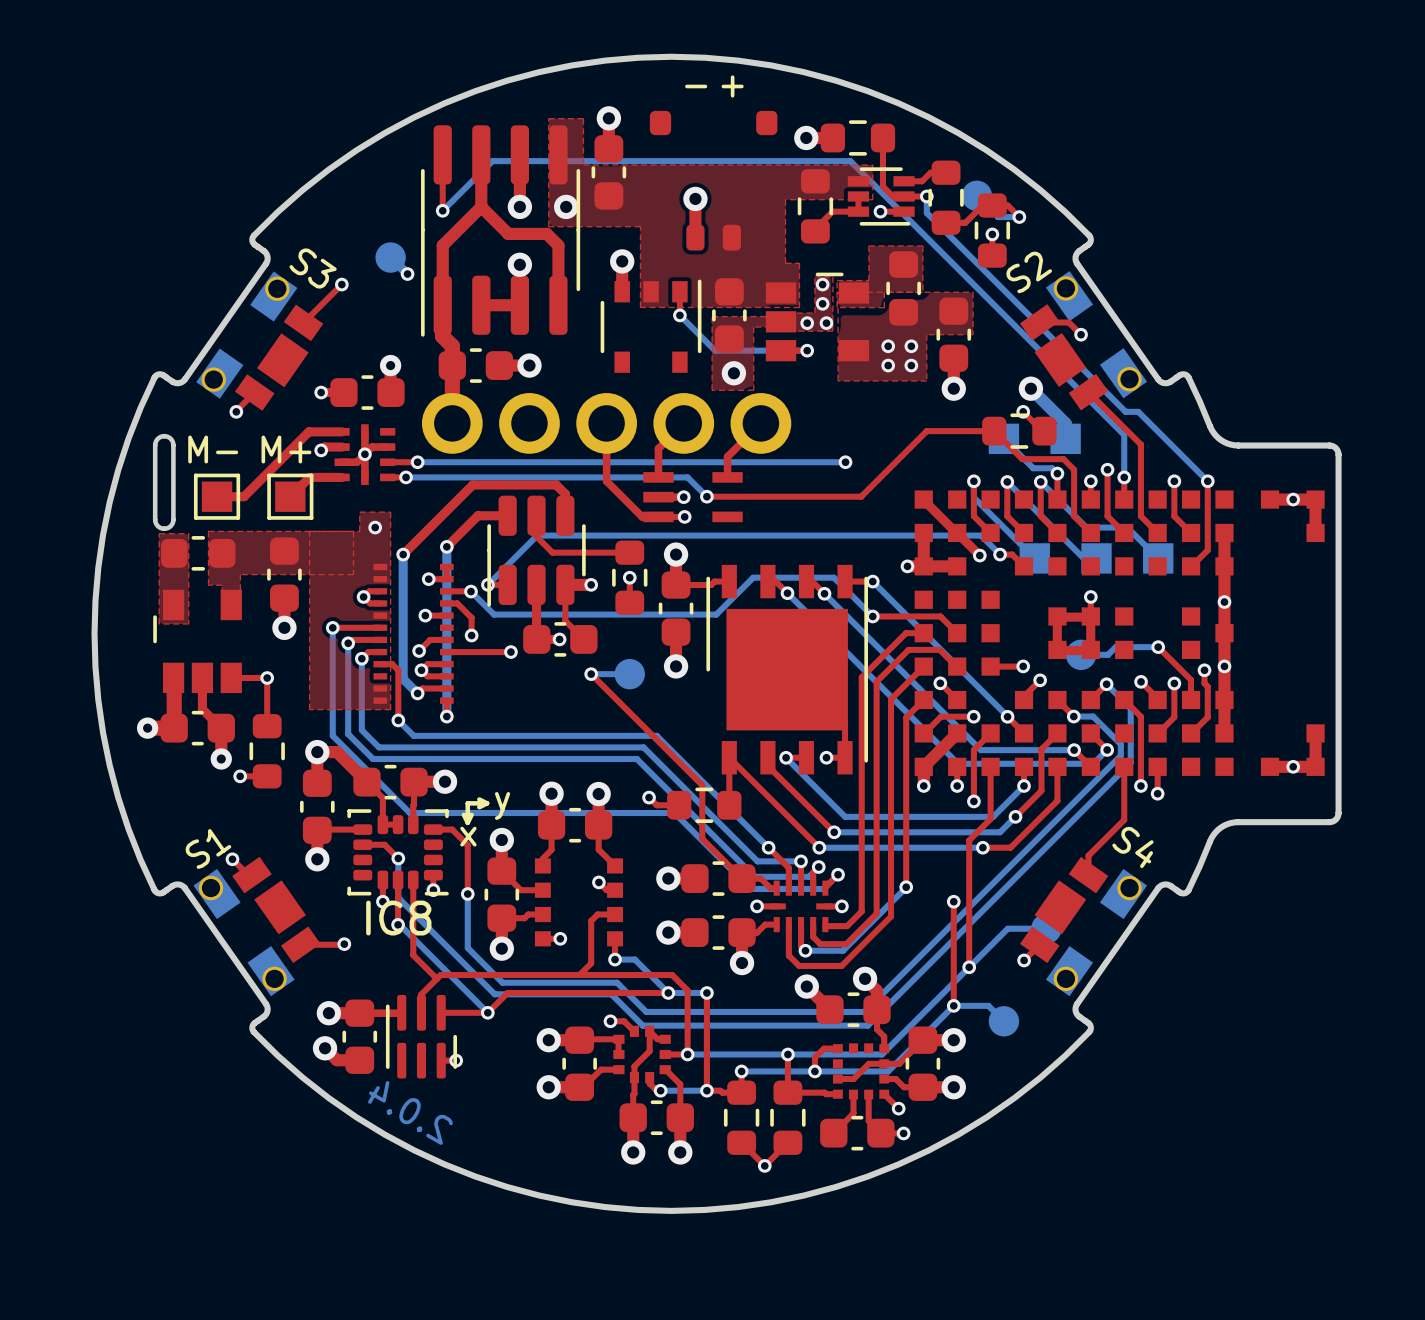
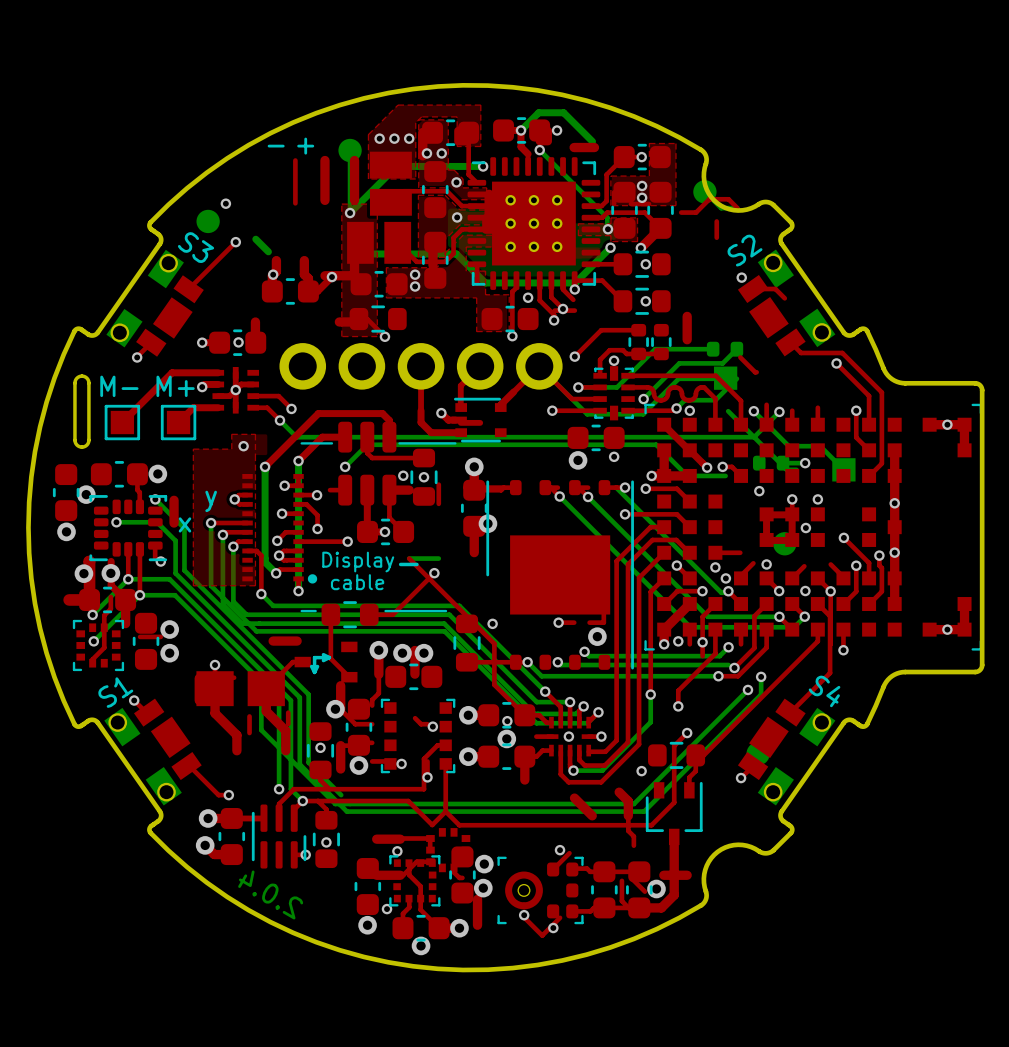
top zone outline: none -> (398, 105) (368, 134) (368, 179) (415, 179) (415, 122) (421, 116) (457, 116) (457, 146) (480, 146) (480, 105) (398, 105)
text position: - (696, 86) -> - (276, 146)
text position: + (732, 86) -> + (305, 146)
top zone outline: none -> (418, 119) (418, 187) (445, 187) (457, 199) (486, 199) (486, 187) (463, 187) (463, 179) (454, 170) (448, 170) (448, 119) (418, 119)
via size: [596, 106, 622, 131] -> [403, 133, 415, 144]
top track: none -> (503, 130) (521, 130) (521, 146) (528, 154) (528, 166)
bottom track: none -> (521, 130) (538, 112) (563, 112) (592, 141)
part: none -> (521, 130)
via: none -> (521, 130)
via: none -> (557, 130)
top zone outline: (548, 118) (548, 226) (640, 226) (640, 307) (799, 307) (799, 263) (785, 263) (785, 199) (872, 199) (872, 164) (583, 164) (583, 118) (548, 118) -> none
part: none -> (450, 132)
top track: none -> (468, 132) (468, 174) (476, 182)
via: none -> (379, 138)
via: none -> (394, 138)
top zone outline: none -> (649, 143) (649, 176) (610, 176) (610, 205) (675, 205) (675, 143) (649, 143)
via: (806, 137) -> none
part: (857, 137) -> none
top track: (882, 137) (882, 186) (892, 196) (926, 196) -> none
bottom track: none -> (350, 150) (350, 213) (396, 166) (483, 166)
part: none -> (350, 150)
bottom track: none -> (539, 150) (607, 217) (607, 229)
via: none -> (539, 150)
via: none -> (426, 153)
via: none -> (441, 153)
top track: none -> (641, 157) (624, 157) (606, 174) (606, 201) (601, 206) (590, 206)
via: none -> (641, 157)
part: none -> (642, 157)
via: none -> (483, 166)
part position: (608, 172) -> (435, 189)
top track: (946, 172) (930, 172) (922, 181) (904, 181) -> none
via: none -> (456, 182)
part: none -> (390, 183)
via: none -> (642, 185)
via size: [507, 194, 533, 220] -> [344, 207, 356, 219]
part: (881, 196) -> none
bottom track: (926, 196) (926, 212) (1125, 411) (1138, 411) (1207, 481) -> none
via: (926, 196) -> none
part: (946, 197) -> none
via: (695, 198) -> none
top zone outline: none -> (418, 195) (418, 257) (445, 257) (445, 239) (459, 224) (489, 224) (489, 210) (459, 209) (445, 195) (418, 195)
via: none -> (642, 197)
via: (566, 206) -> none
part: (815, 206) -> none
top track: none -> (393, 201) (403, 191) (447, 191) (461, 206) (476, 206)
bottom track: (442, 210) (492, 161) (850, 161) (1124, 435) (1124, 477) -> none
via: (442, 210) -> none
via: none -> (225, 203)
top zone outline: none -> (341, 204) (377, 204) (377, 336) (341, 336) (341, 204)
top track: (855, 211) (832, 211) (815, 228) (815, 231) -> none
via: (880, 211) -> none
via: (1019, 217) -> none
part: none -> (624, 210)
part: none -> (660, 210)
via: none -> (457, 217)
top track: none -> (590, 217) (602, 217) (607, 212) (644, 212) (660, 228) (640, 248)
top zone outline: none -> (610, 217) (610, 223) (578, 223) (578, 235) (610, 235) (610, 241) (637, 241) (637, 217) (610, 217)
part: (500, 230) -> none
part: (992, 230) -> none
via: (992, 234) -> none
board edge: (253, 235) (302, 190) (356, 150) (414, 117) (444, 103) (507, 80) (572, 65) (605, 60) (671, 56) (738, 60) (771, 65) (836, 80) (898, 103) (958, 133) (986, 150) (1040, 190) (1089, 235) -> (150, 222) (187, 188) (227, 158) (293, 122) (363, 98) (413, 89) (462, 85) (537, 90) (586, 100) (633, 116) (679, 137) (703, 151) (706, 158) (703, 172) (705, 185) (711, 197) (717, 203) (725, 207) (738, 210) (751, 208) (762, 202) (769, 202) (790, 222)
part: none -> (533, 223)
top track: none -> (476, 229) (462, 229) (453, 237) (453, 253) (445, 261) (416, 261) (397, 242)
via: none -> (607, 229)
part footprint: [886, 251, 921, 326] -> [613, 250, 671, 278]
top zone outline: none -> (463, 235) (501, 235) (501, 247) (466, 247) (466, 271) (485, 271) (485, 294) (509, 294) (509, 331) (476, 331) (476, 297) (386, 297) (386, 267) (436, 267) (445, 258) (445, 252) (463, 235)
part position: (390, 257) -> (208, 221)
top track: none -> (235, 242) (218, 259)
via: none -> (235, 242)
via: (622, 261) -> none
part: none -> (379, 242)
via: (519, 264) -> none
bottom track: none -> (610, 247) (575, 282) (485, 282) (456, 253) (362, 253)
via: none -> (610, 247)
via: none -> (640, 248)
via: (407, 274) -> none
top zone outline: (814, 276) (814, 313) (768, 313) (768, 331) (832, 331) (832, 276) (814, 276) -> none
via: (341, 284) -> none
via: (822, 284) -> none
top track: none -> (276, 260) (276, 271) (272, 275) (272, 291)
top track: none -> (304, 260) (304, 274) (308, 278) (308, 291) (317, 291) (331, 277)
part: none -> (435, 260)
top track: none -> (590, 264) (622, 264)
via: none -> (645, 264)
top zone outline: (838, 292) (973, 292) (973, 334) (926, 334) (926, 380) (838, 380) (838, 292) -> none
top zone outline: (884, 292) (884, 307) (837, 307) (837, 280) (868, 280) (868, 245) (922, 245) (922, 292) -> none
via: none -> (273, 274)
via: none -> (415, 274)
via: (822, 303) -> none
top track: (558, 305) (558, 245) (546, 233) (508, 233) (481, 206) (442, 245) (442, 336) (452, 346) (452, 423) -> none
via: none -> (331, 277)
via: none -> (741, 277)
top track: none -> (516, 280) (516, 287) (512, 291) (512, 335)
top track: none -> (539, 280) (539, 300) (554, 314) (554, 320)
top track: none -> (551, 280) (551, 297) (562, 308)
top track: none -> (563, 280) (563, 289) (573, 299)
top track: none -> (574, 280) (602, 280) (622, 301)
bottom track: (679, 315) (715, 350) (807, 350) -> none
via: (679, 315) -> none
part rotation: 0° (729, 315) -> 90° clockwise (510, 319)
part position: (729, 315) -> (510, 319)
part: none -> (379, 284)
top zone outline: (712, 316) (712, 390) (753, 390) (753, 327) (790, 327) (790, 316) (712, 316) -> none
part: (817, 316) -> none
via: none -> (415, 286)
via: (826, 323) -> none
part: none -> (290, 291)
part: (651, 326) -> none
via: none -> (528, 297)
part: (953, 334) -> none
via: (1081, 334) -> none
part: none -> (642, 301)
via: none -> (645, 301)
via: (888, 346) -> none
via: (911, 346) -> none
via: none -> (562, 308)
via: (807, 350) -> none
top track: none -> (358, 319) (367, 319) (384, 336)
part: none -> (378, 319)
via size: [721, 361, 747, 386] -> [507, 330, 518, 342]
via: none -> (554, 320)
via: (390, 365) -> none
part: (475, 365) -> none
via: (529, 365) -> none
via: (888, 365) -> none
via: (911, 365) -> none
top track: none -> (638, 330) (601, 330) (574, 356)
via: none -> (384, 336)
via: (953, 388) -> none
bottom track: (1030, 388) (1065, 423) (1065, 438) -> none
via: (1030, 388) -> none
part: none -> (638, 342)
part: none -> (661, 342)
via: none -> (238, 342)
bottom track: none -> (713, 349) (655, 349) (616, 387) (578, 387)
part: none -> (725, 349)
bottom track: none -> (736, 349) (722, 363) (679, 363) (643, 399)
top track: (1102, 405) (1140, 444) (1140, 516) (1157, 532) -> (801, 352) (842, 352) (881, 392) (881, 410)
top track: none -> (661, 353) (626, 353) (622, 350) (609, 350) (600, 359) (600, 375)
via: none -> (574, 356)
via: (1023, 411) -> none
via: none -> (614, 360)
top track: none -> (836, 363) (869, 395) (869, 424)
via: none -> (836, 363)
top track: none -> (539, 366) (572, 399) (600, 399)
bottom track: none -> (539, 366) (587, 414) (643, 414) (678, 378) (713, 378)
top track: (308, 431) (244, 496) (217, 496) -> (192, 372) (172, 372) (122, 422)
part: (1019, 431) -> none
top track: none -> (628, 375) (715, 375) (741, 400) (741, 424)
bottom track: (1003, 438) (1033, 468) (1052, 468) (1057, 473) -> none
part: (1065, 438) -> none
bottom track: none -> (736, 378) (715, 400) (684, 400) (676, 408)
top track: none -> (578, 387) (600, 387)
via: none -> (578, 387)
top track: none -> (628, 387) (650, 387) (655, 397) (660, 400) (666, 398) (668, 390) (672, 387) (679, 388) (683, 398) (689, 400) (694, 397) (698, 388) (704, 387) (715, 398) (715, 424)
top track: (727, 456) (727, 477) -> (513, 391) (500, 404) (500, 407)
part: none -> (614, 393)
top track: none -> (276, 396) (278, 396) (291, 408)
bottom track: (417, 462) (845, 462) -> none
via: (417, 462) -> none
via: (845, 462) -> none
via: none -> (643, 399)
top track: (1107, 469) (1107, 516) (1124, 532) -> none
via: (1107, 469) -> none
part footprint: [643, 472, 743, 523] -> [451, 397, 507, 443]
via: (1057, 473) -> none
top track: none -> (267, 407) (279, 420)
bottom track: (406, 477) (687, 477) (706, 496) -> none
via: (406, 477) -> none
via: (1124, 477) -> none
via: none -> (291, 408)
top track: none -> (676, 408) (674, 410) (628, 410)
via: none -> (676, 408)
top track: (606, 481) (642, 516) (684, 516) -> (421, 410) (421, 422) (431, 432) (461, 432)
top track: none -> (552, 410) (600, 410)
via: none -> (552, 410)
top track: (973, 481) (973, 516) (990, 532) -> none
bottom track: (973, 481) (973, 497) (1034, 558) -> none
via position: (973, 481) -> (689, 410)
top track: (1007, 481) (1007, 516) (1024, 532) -> none
via: (1007, 481) -> none
top track: (1040, 481) (1040, 516) (1057, 532) -> none
via: (1090, 481) -> none
via: (1207, 481) -> none
bottom track: none -> (779, 411) (754, 437) (296, 437) (279, 420)
via: none -> (779, 411)
top track: none -> (441, 413) (448, 420) (455, 420)
via: none -> (441, 413)
part footprint: [914, 490, 1325, 776] -> [644, 403, 983, 651]
via: none -> (279, 420)
part footprint: [487, 495, 586, 607] -> [338, 421, 397, 506]
top track: (706, 496) (861, 496) (926, 431) (994, 431) (1022, 459) (1063, 459) (1074, 469) (1074, 516) (1090, 532) -> none
via: (706, 496) -> none
via: (683, 497) -> none
via: (684, 516) -> none
part: none -> (596, 437)
line: none -> (301, 443) (331, 443)
line: none -> (399, 443) (455, 443)
top zone outline: (309, 531) (208, 531) (208, 585) (222, 585) (222, 612) (240, 612) (240, 574) (353, 574) (353, 531) -> none
top zone outline: (159, 533) (159, 623) (188, 623) (188, 533) (159, 533) -> none
part footprint: [161, 536, 236, 571] -> [90, 461, 148, 488]
via: none -> (614, 456)
top track: (542, 543) (552, 552) (629, 552) -> (372, 458) (424, 458)
via: none -> (578, 460)
part: none -> (771, 463)
bottom track: none -> (783, 463) (805, 463)
via: none -> (805, 463)
bottom track: none -> (345, 466) (367, 444) (656, 444) (687, 475) (725, 475)
bottom track: (1000, 554) (981, 535) (537, 535) (487, 584) -> none
part: (1034, 558) -> none
part: (1096, 558) -> none
via: none -> (157, 473)
part footprint: [373, 563, 454, 704] -> [242, 473, 318, 584]
top track: none -> (137, 474) (139, 506)
part footprint: [706, 564, 868, 775] -> [486, 480, 634, 670]
via: none -> (403, 475)
via: none -> (424, 477)
part: (284, 574) -> none
part position: (629, 577) -> (424, 477)
via: (629, 577) -> none
bottom track: none -> (616, 487) (721, 592) (729, 592)
bottom track: (872, 581) (1007, 716) -> none
top track: none -> (645, 488) (677, 488) (689, 501)
via: none -> (645, 488)
via position: (487, 584) -> (345, 466)
via: (591, 584) -> none
via: none -> (759, 491)
part: none -> (66, 492)
part footprint: [153, 589, 242, 694] -> [89, 495, 168, 562]
via: none -> (86, 494)
bottom track: (471, 591) (494, 614) (716, 614) (753, 577) (833, 577) (872, 616) -> none
via: none -> (155, 499)
via: none -> (817, 499)
bottom track: none -> (116, 522) (157, 522) (175, 540) (175, 573) (299, 697) (299, 764) (346, 811) (644, 811) (761, 694) (761, 676)
via: none -> (116, 522)
via: (284, 627) -> none
via: none -> (805, 528)
via: none -> (66, 531)
bottom track: (1158, 647) (1115, 647) (1108, 654) (1081, 654) -> none
top track: none -> (155, 545) (155, 558)
top track: none -> (128, 549) (128, 579)
top track: none -> (139, 549) (139, 595)
via position: (676, 666) -> (487, 523)
via: (1023, 666) -> none
via position: (591, 674) -> (434, 573)
part: (629, 674) -> none
top track: (231, 677) (267, 677) (267, 726) -> none
text: none -> Display (358, 562)
via position: (1040, 680) -> (766, 564)
line: none -> (400, 564) (416, 564)
via: (1141, 681) -> none
bottom track: (1106, 684) (1130, 708) (1130, 762) (867, 1025) (642, 1025) (611, 994) -> (747, 689) (633, 804) (424, 804)
via: (1106, 684) -> none
via: none -> (715, 567)
via: none -> (83, 573)
via: none -> (110, 573)
top track: none -> (434, 573) (392, 614) (369, 614)
via: none -> (725, 578)
via: none -> (128, 579)
text: none -> cable (357, 582)
bottom track: (332, 709) (332, 735) (409, 813) (674, 813) (750, 888) (757, 888) -> (211, 585) (256, 631) (444, 631) (536, 723)
bottom track: (1073, 716) (1093, 716) (1120, 744) (1120, 755) (864, 1011) (646, 1011) (617, 982) (502, 982) -> none
via: none -> (805, 591)
via: none -> (830, 591)
via: none -> (139, 595)
top track: none -> (110, 597) (110, 608) (104, 615) (104, 647) (92, 659) (92, 663)
via: (147, 728) -> none
line: none -> (301, 611) (315, 611)
line: none -> (385, 611) (446, 611)
bottom track: none -> (92, 614) (128, 579) (169, 579) (290, 700) (290, 789) (302, 801)
via: none -> (92, 614)
top track: none -> (330, 614) (330, 658) (349, 677)
part: none -> (350, 614)
via size: [819, 750, 834, 765] -> [588, 627, 607, 646]
part: (267, 751) -> none
via: (317, 752) -> none
top track: (767, 757) (767, 765) (834, 832) -> none
bottom track: (786, 757) (845, 816) (993, 816) (1024, 786) -> none
via: (221, 759) -> none
via: none -> (492, 623)
via: none -> (169, 629)
via: (240, 776) -> none
via: (445, 781) -> none
bottom track: none -> (93, 641) (139, 595) (174, 595) (279, 699) (279, 789)
via: none -> (93, 641)
part: none -> (146, 641)
part: (390, 782) -> none
top track: (414, 782) (413, 824) -> none
via: none -> (678, 641)
top track: (1124, 782) (1124, 819) (1088, 855) (1088, 875) -> (817, 604) (830, 616) (830, 673) (790, 712)
top track: none -> (817, 641) (703, 755) (695, 755) (695, 771) (689, 777) (689, 790)
top track: (317, 783) (317, 752) (336, 752) (382, 798) (382, 824) (398, 824) -> none
via: none -> (702, 642)
via: (957, 786) -> none
via position: (1024, 786) -> (728, 647)
via: (1140, 786) -> none
part: none -> (98, 645)
bottom track: none -> (728, 647) (719, 656) (588, 656) (584, 651)
top track: (1057, 790) (1057, 800) (1010, 847) (982, 847) -> (766, 647) (738, 676) (718, 676)
via: (598, 794) -> none
via: none -> (584, 651)
via: none -> (169, 653)
via: none -> (402, 653)
via: none -> (424, 653)
top track: (649, 797) (656, 805) (678, 805) -> none
via: (649, 797) -> none
top track: (990, 798) (990, 819) (969, 840) (969, 967) -> (715, 653) (678, 690) (678, 706)
via: (973, 801) -> none
text position: y (502, 805) -> y (211, 501)
part rotation: 0° (704, 805) -> 90° clockwise (467, 643)
top track: (729, 805) (729, 757) (819, 847) -> none
part: (317, 806) -> none
top track: none -> (302, 662) (292, 662) (266, 688) (266, 711) (285, 730) (285, 750)
part: none -> (326, 662)
top track: none -> (467, 662) (527, 662)
bottom track: none -> (527, 662) (541, 676) (718, 676)
via: none -> (527, 662)
bottom track: none -> (557, 662) (560, 665) (728, 665)
via: none -> (557, 662)
top track: none -> (215, 665) (215, 713) (236, 735) (236, 750)
via: none -> (215, 665)
bottom track: (1015, 816) (1000, 832) (834, 832) -> none
part position: (575, 825) -> (413, 676)
top track: (598, 825) (598, 849) (615, 865) -> none
via: none -> (718, 676)
via: none -> (761, 676)
top track: (443, 829) (452, 829) (467, 845) (467, 894) -> none
via: (834, 832) -> none
text position: x (468, 836) -> x (184, 524)
via position: (501, 840) -> (335, 709)
part: none -> (240, 688)
top track: (362, 844) (384, 844) (398, 858) -> none
via: none -> (747, 689)
bottom track: (819, 847) (982, 847) -> none
via: (819, 847) -> none
via: (982, 847) -> none
top track: (906, 851) (906, 887) -> none
bottom track: none -> (650, 694) (650, 721)
via: none -> (650, 694)
IC8: (398, 852) -> none
via: (398, 858) -> none
part footprint: [534, 858, 624, 947] -> [380, 698, 456, 774]
via: (317, 859) -> none
via: none -> (678, 706)
top track: (398, 880) (398, 924) -> none
top track: (413, 880) (413, 955) (436, 978) -> none
via position: (598, 882) -> (432, 726)
via: none -> (507, 721)
via: (906, 887) -> none
via: (433, 890) -> none
bottom track: (467, 894) (467, 948) -> (155, 499) (184, 528) (184, 570) (308, 694) (308, 762) (314, 768)
via: (467, 894) -> none
part position: (501, 894) -> (358, 727)
via: (382, 901) -> none
top track: (953, 901) (953, 1005) -> (687, 733) (674, 745) (674, 802) (651, 825) (459, 825) (445, 811)
via: (757, 906) -> none
via: none -> (568, 736)
via: none -> (506, 738)
top track: (615, 914) (597, 914) (591, 921) (591, 963) (579, 975) -> none
via: none -> (320, 747)
bottom track: (398, 924) (487, 1012) -> none
via: (398, 924) -> none
part: none -> (320, 750)
bottom track: (1046, 928) (1007, 928) (882, 1054) (687, 1054) -> none
part: none -> (676, 755)
via position: (560, 938) -> (401, 763)
top track: none -> (445, 763) (445, 811)
top track: none -> (189, 766) (218, 795) (228, 795)
top track: (344, 944) (300, 944) -> none
via: (344, 944) -> none
via position: (501, 948) -> (358, 765)
top track: none -> (320, 769) (320, 780) (329, 789)
via: none -> (641, 771)
bottom track: (615, 959) (634, 959) (668, 992) (706, 992) -> none
via: (742, 963) -> none
via: (969, 967) -> none
via: none -> (279, 789)
top track: (610, 975) (672, 975) (687, 990) (687, 1054) (665, 1054) -> (424, 789) (424, 758) (437, 745) (445, 745)
via: (865, 978) -> none
via: none -> (228, 795)
via: (806, 986) -> none
via: none -> (302, 801)
top track: none -> (317, 801) (326, 809) (326, 820)
top track: (668, 992) (507, 992) (487, 1012) (441, 1012) -> (445, 811) (432, 825) (408, 801) (302, 801) (294, 809) (294, 818)
via: (668, 992) -> none
top track: (706, 992) (706, 1090) (741, 1092) (741, 1071) -> none
via: (706, 992) -> none
via: (953, 1005) -> none
part: none -> (674, 813)
part: (853, 1009) -> none
via: (487, 1012) -> none
top track: (610, 1021) (624, 1021) (634, 1031) -> none
via: (610, 1021) -> none
bottom track: (1003, 1021) (988, 1005) (953, 1005) (888, 1071) (741, 1071) -> none
part: (1003, 1021) -> none
board edge: (253, 1032) (302, 1077) (356, 1117) (414, 1150) (444, 1164) (475, 1176) (539, 1195) (605, 1207) (671, 1210) (738, 1207) (803, 1195) (836, 1186) (898, 1164) (958, 1134) (986, 1117) (1040, 1077) (1089, 1032) -> (150, 832) (187, 867) (227, 896) (293, 932) (339, 950) (388, 962) (462, 969) (512, 968) (562, 960) (633, 938) (679, 917) (703, 903) (706, 896) (703, 882) (705, 869) (708, 861) (717, 851) (729, 846) (738, 844) (751, 847) (762, 852) (769, 852) (790, 832)
top track: none -> (674, 836) (674, 895) (661, 907) (593, 907) (590, 911) (572, 911)
top track: (665, 1039) (657, 1039) (649, 1031) (649, 1051) (634, 1066) (633, 1152) -> none
part: none -> (326, 839)
via: (548, 1040) -> none
top track: (953, 1040) (922, 1040) (899, 1063) (868, 1063) (853, 1079) (837, 1079) -> none
via: (953, 1040) -> none
via: none -> (326, 842)
top track: (837, 1048) (823, 1048) (814, 1057) (814, 1071) -> none
via: (687, 1054) -> none
top track: (787, 1054) (787, 1092) (837, 1094) -> none
via: none -> (397, 851)
top track: none -> (569, 853) (553, 869)
part: (579, 1063) -> none
part: (922, 1063) -> none
top track: (665, 1069) (680, 1084) (680, 1117) -> none
top track: none -> (409, 863) (409, 875) (420, 886) (420, 909) (439, 928) (459, 928)
via: (741, 1071) -> none
via: (814, 1071) -> none
part: (861, 1071) -> none
via: none -> (484, 864)
top track: none -> (572, 868) (587, 868) (590, 871) (639, 871)
top track: (884, 1079) (895, 1079) (904, 1087) (922, 1087) -> none
via: (548, 1087) -> none
via: (953, 1087) -> none
bottom track: (660, 1090) (706, 1090) -> none
via: (660, 1090) -> none
via: (706, 1090) -> none
part: none -> (414, 880)
top track: (853, 1094) (853, 1113) (833, 1133) -> none
part: none -> (367, 886)
via size: [891, 1101, 906, 1116] -> [647, 879, 666, 899]
via: none -> (483, 888)
part: none -> (604, 889)
part: none -> (639, 889)
part: none -> (540, 890)
top track: none -> (409, 898) (409, 907) (402, 913) (402, 928)
part rotation: 0° (656, 1117) -> 90° clockwise (462, 874)
part: (741, 1117) -> none
part: (787, 1117) -> none
via: none -> (387, 909)
part: (857, 1133) -> none
via: (903, 1133) -> none
via: none -> (524, 915)
via: none -> (367, 925)
via: (633, 1152) -> none
via: (680, 1152) -> none
part: none -> (421, 928)
via: none -> (459, 928)
via: none -> (553, 928)
via: (764, 1165) -> none
via: none -> (421, 945)

